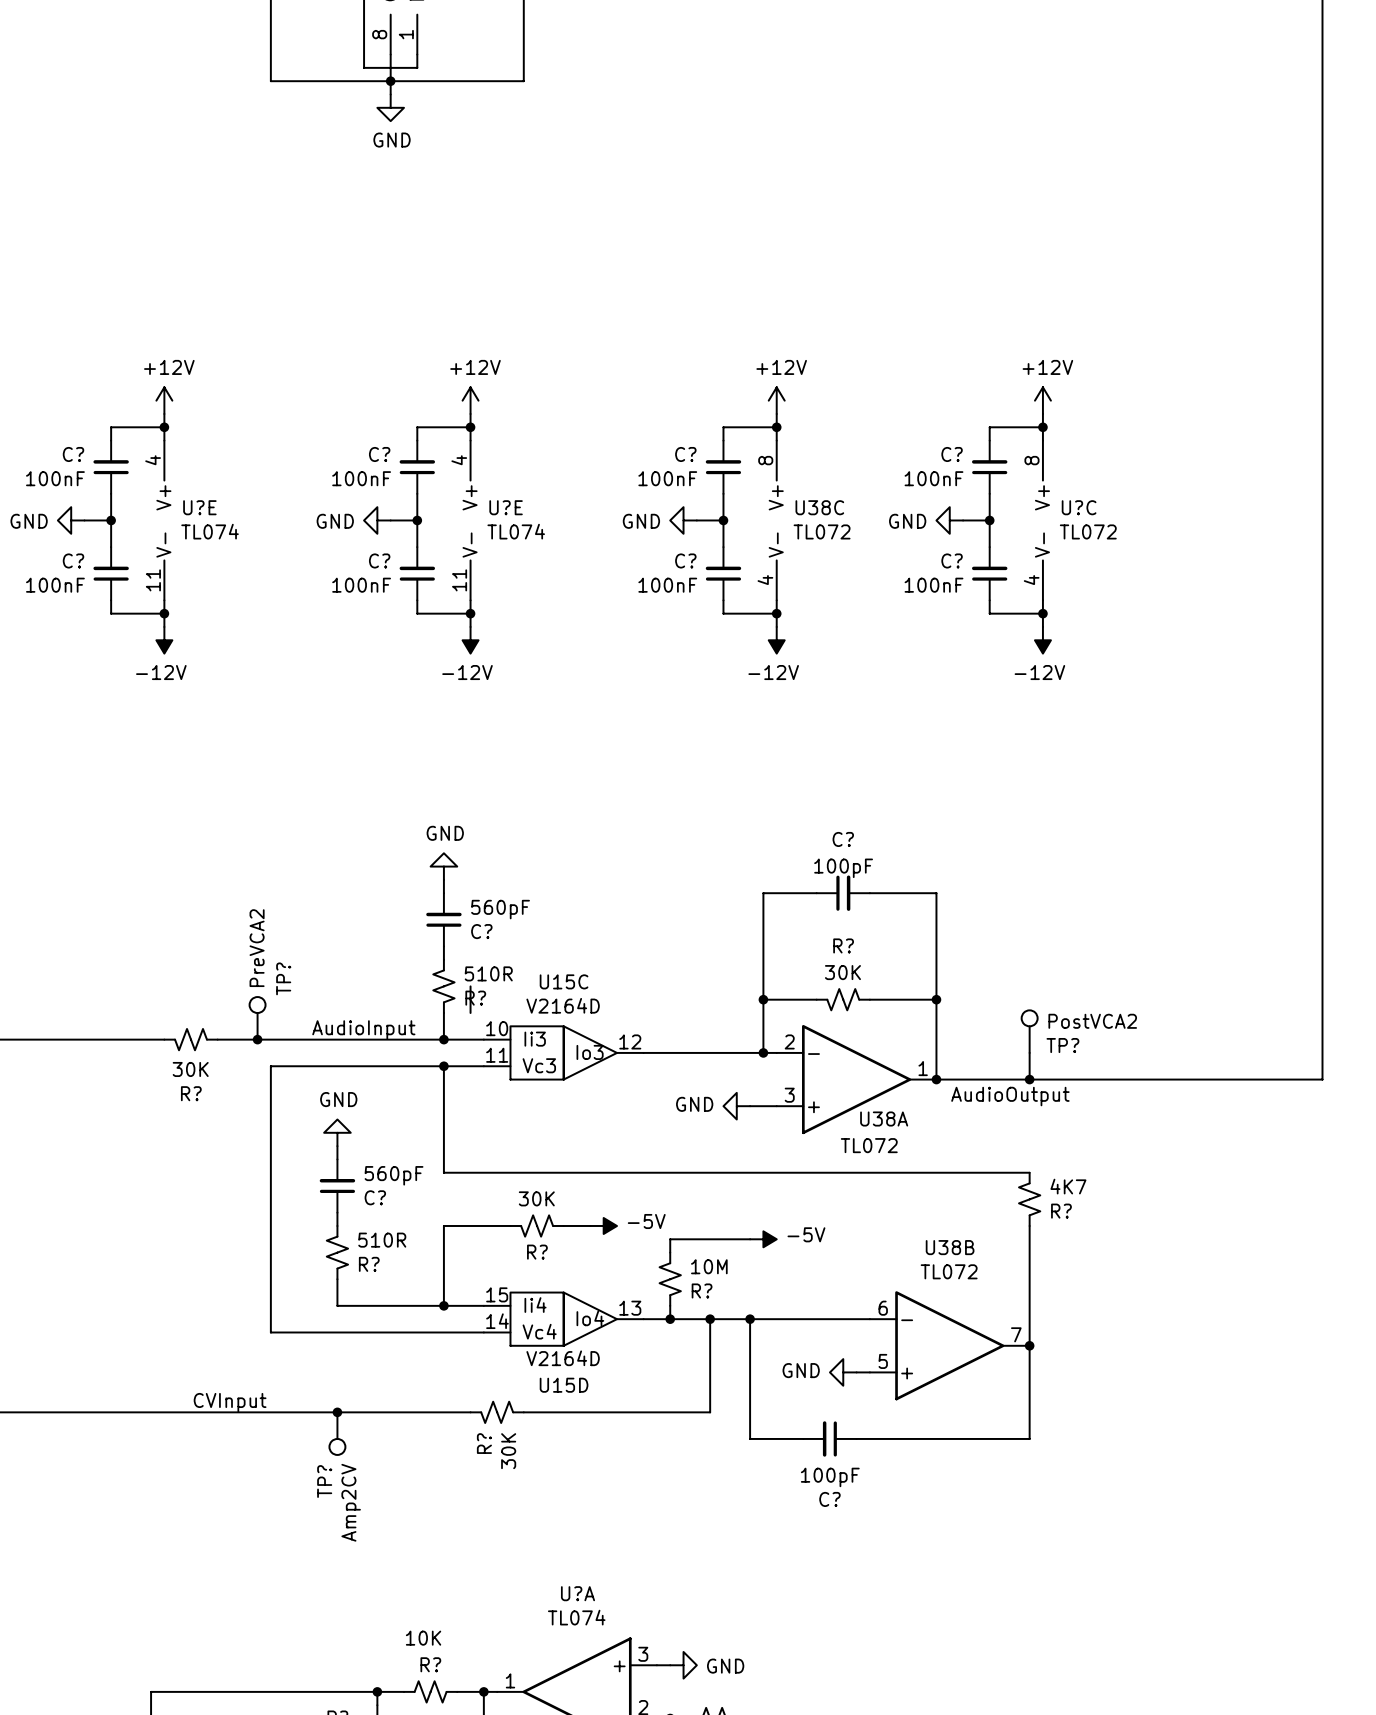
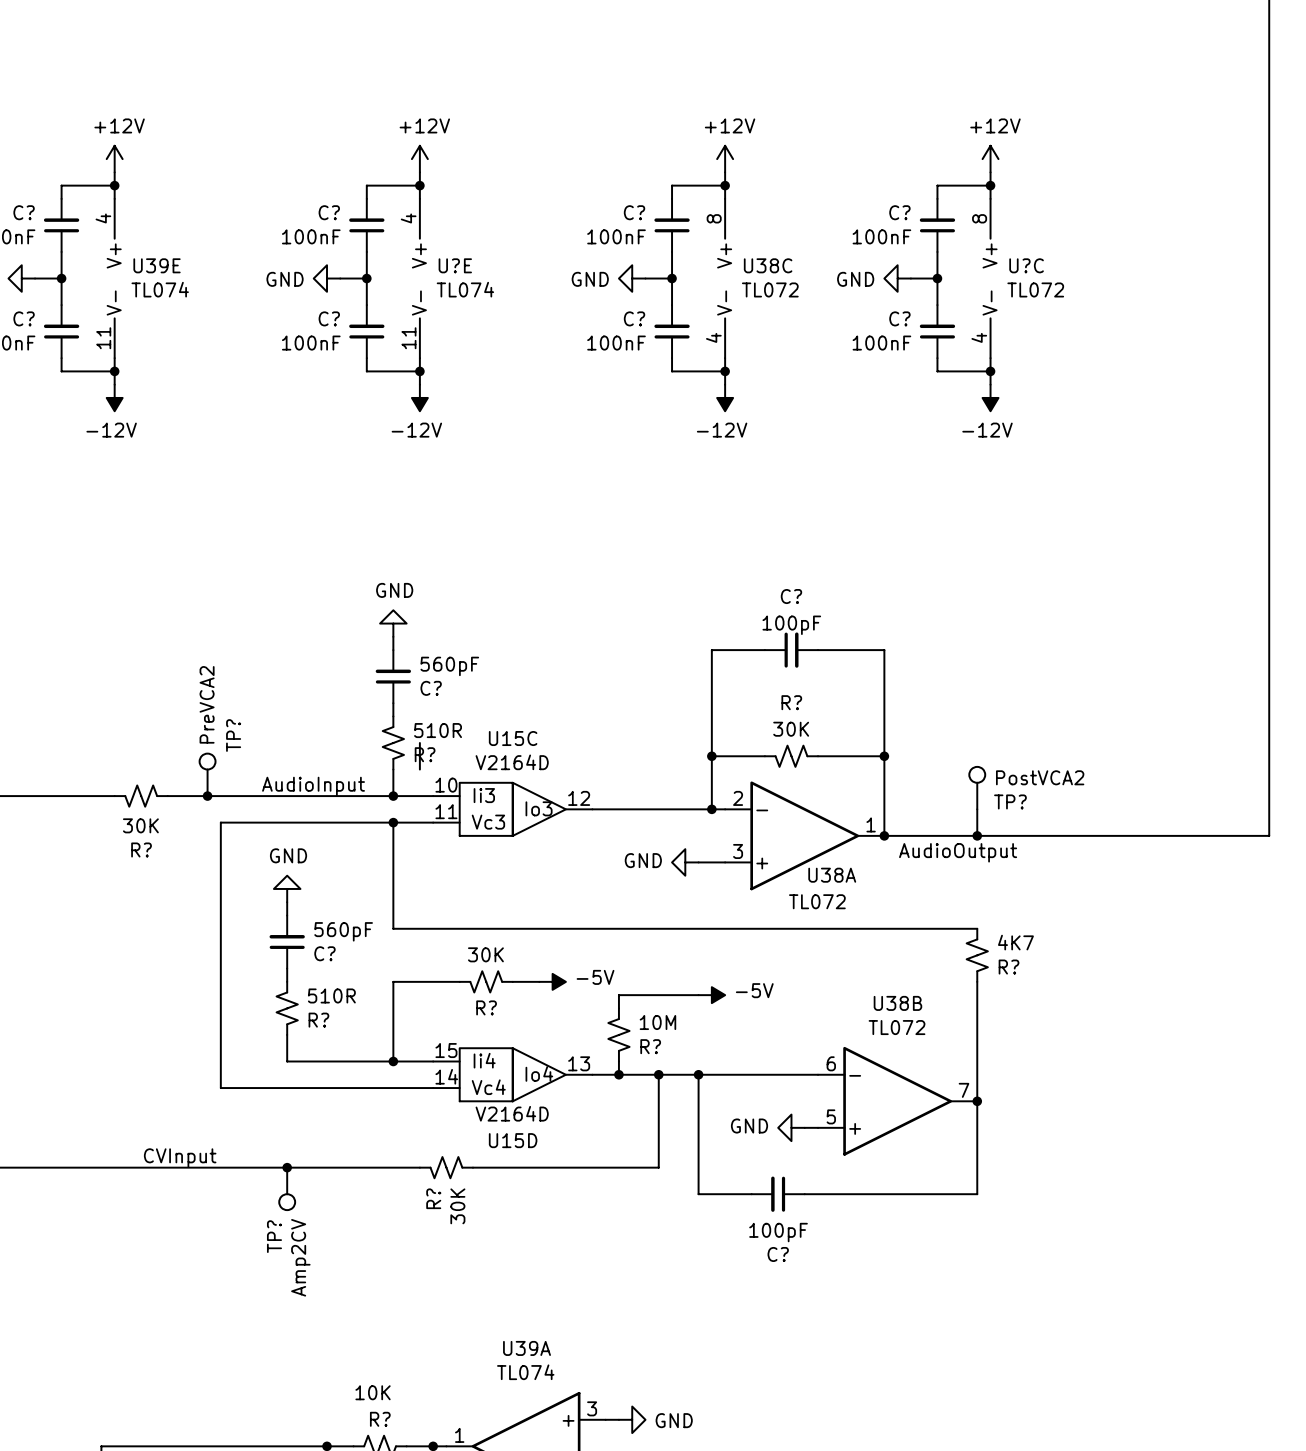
U?E name: U?E (199, 507) -> U39E (157, 265)
U?A name: U?A (577, 1593) -> U39A (527, 1348)

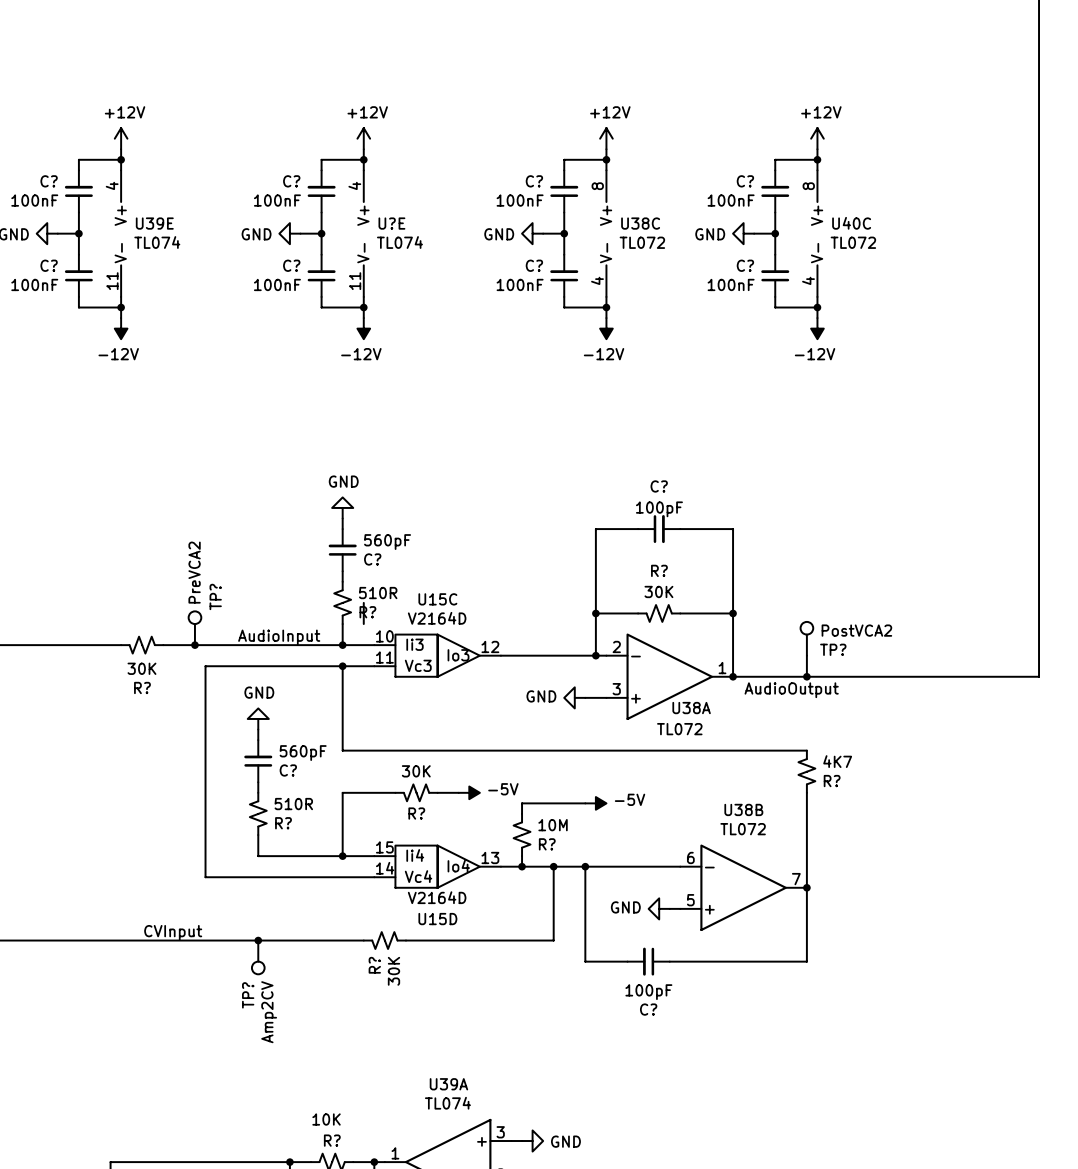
U?C name: U?C (1026, 265) -> U40C (851, 223)

